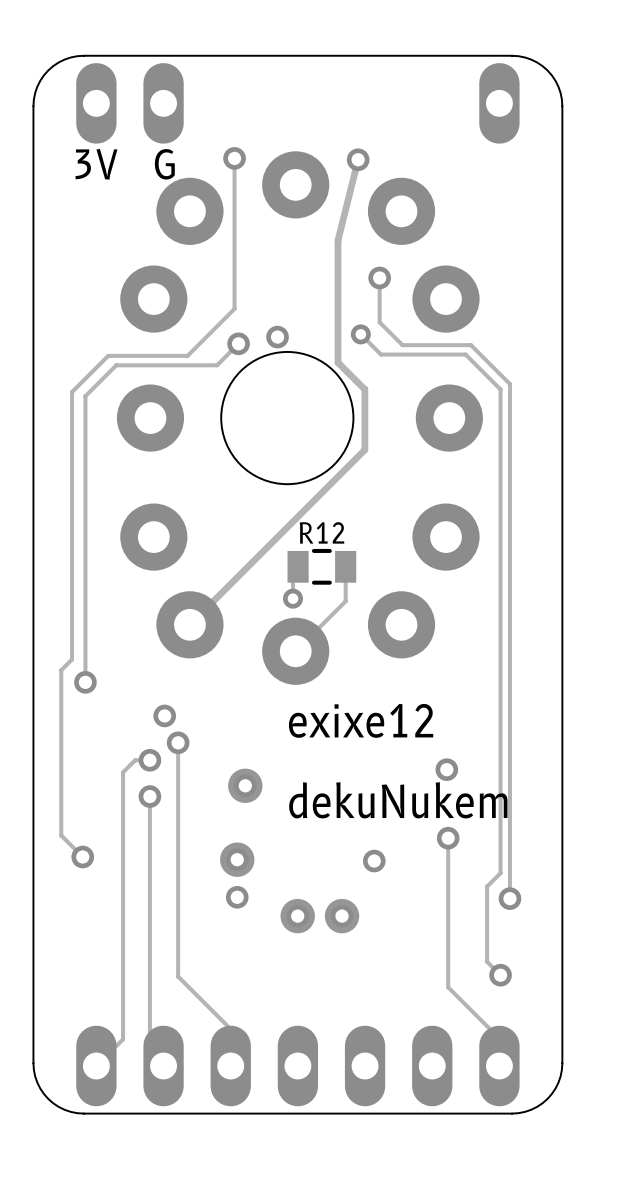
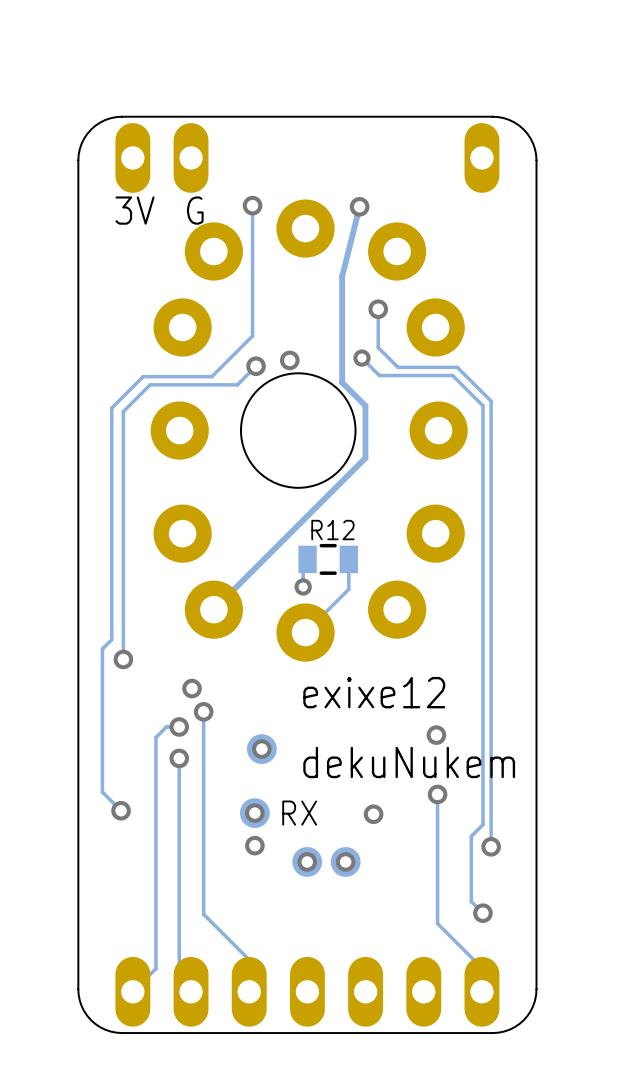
text: none -> RX (299, 813)

